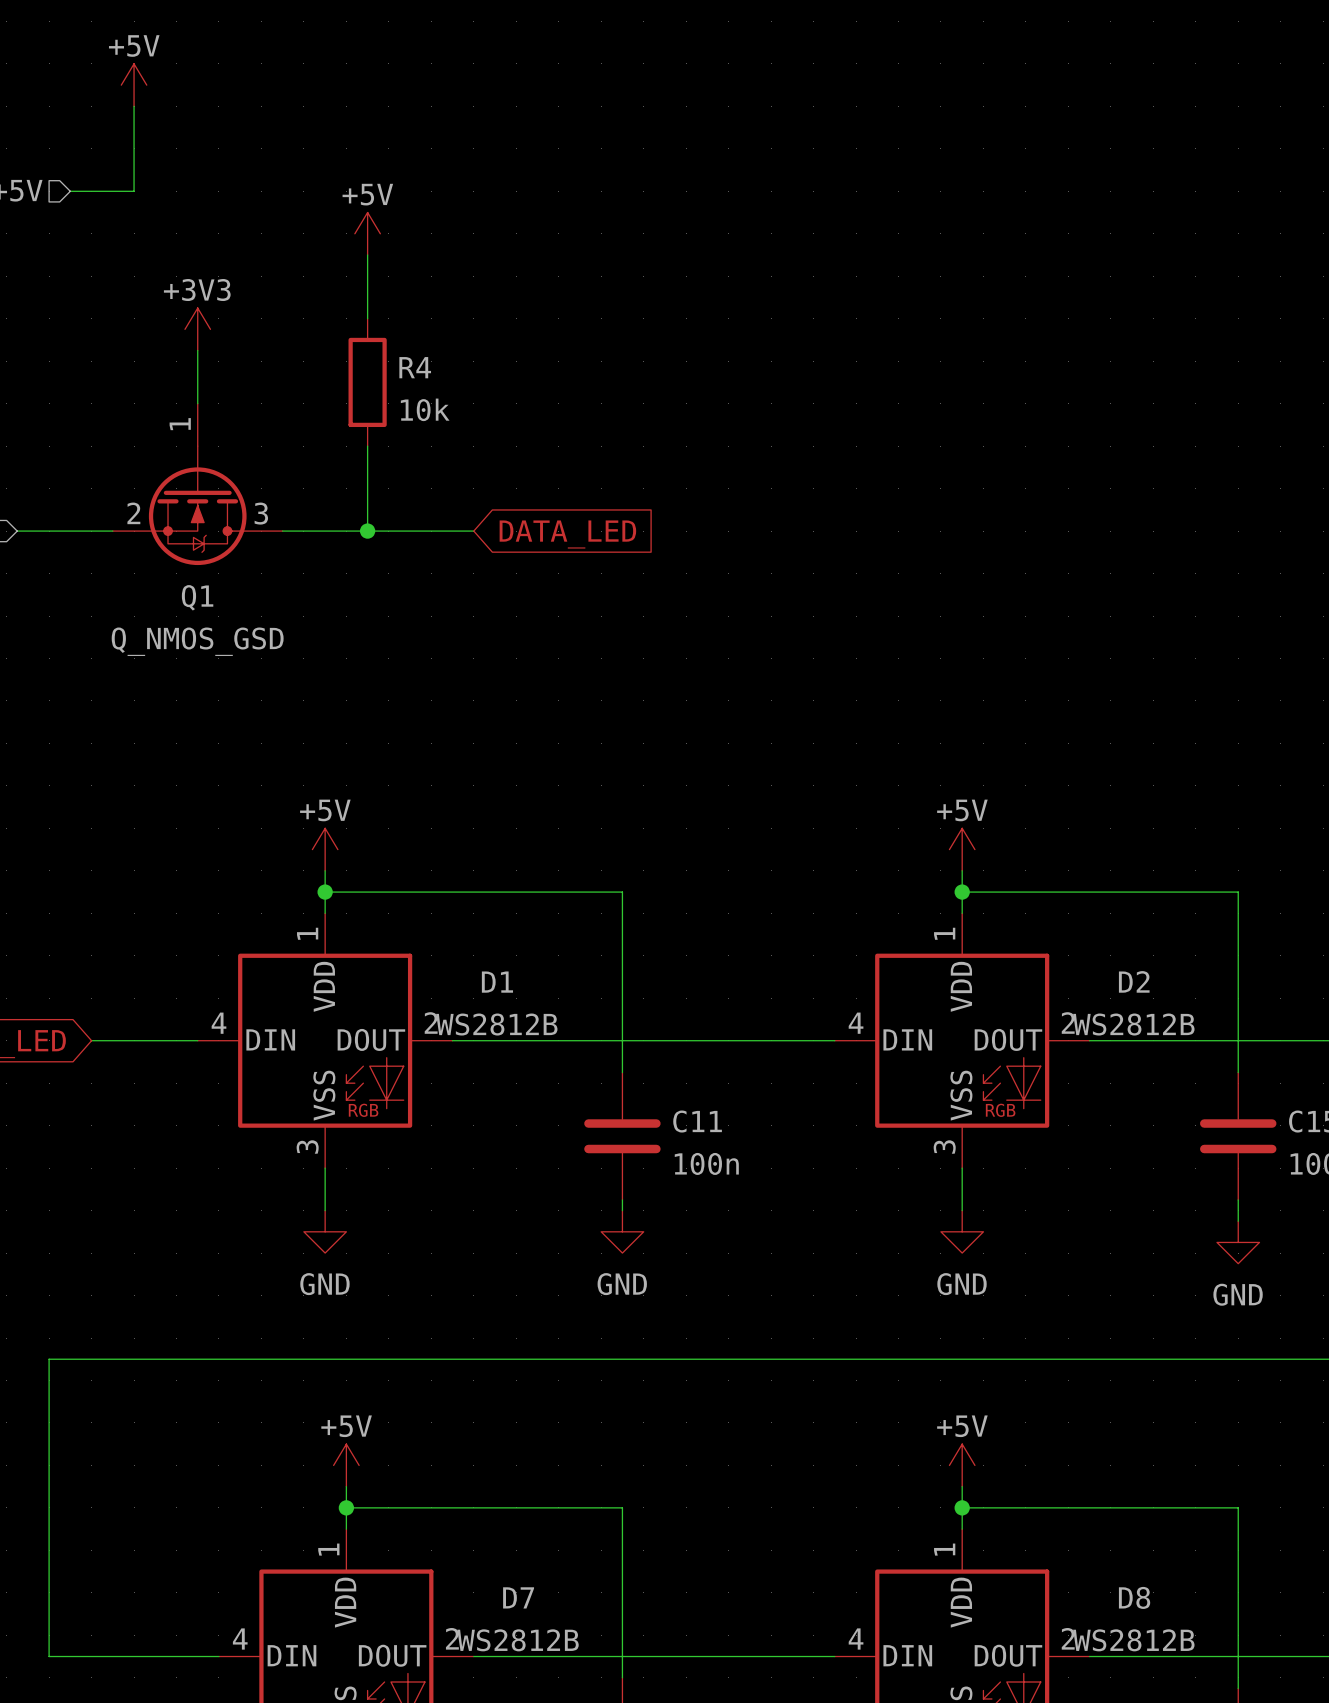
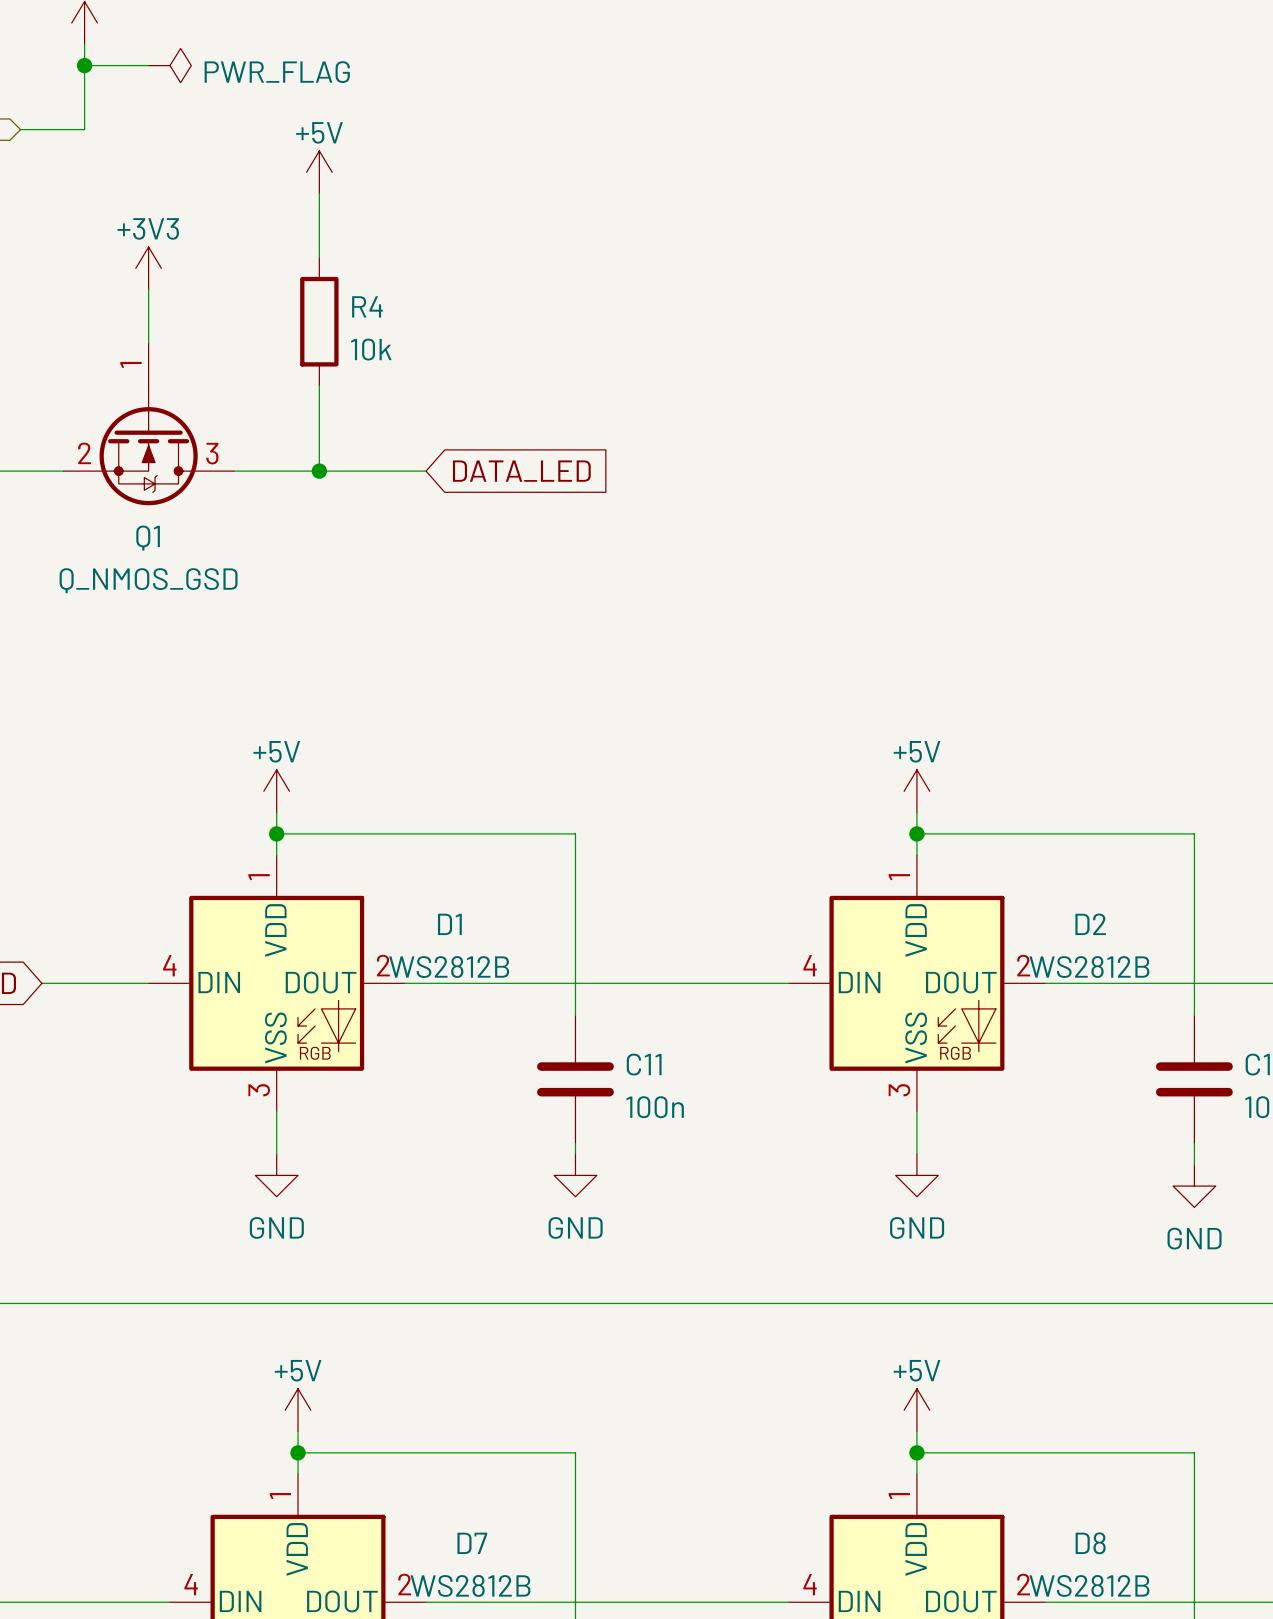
wire: none -> (84, 65) (148, 65)
junction: none -> (84, 65)
power symbol: none -> PWR_FLAG (169, 65)

